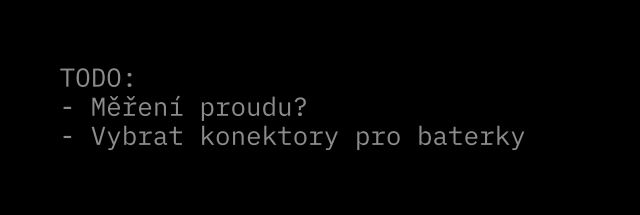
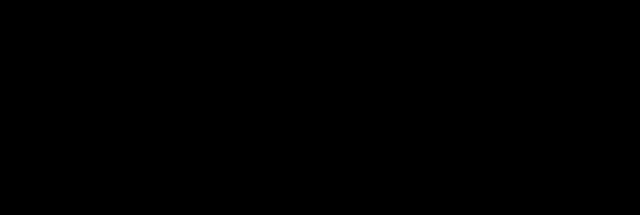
text: TODO: (95, 77) -> none
text: - Měření proudu? (184, 108) -> none
text: - Vybrat konektory pro baterky (293, 137) -> none

